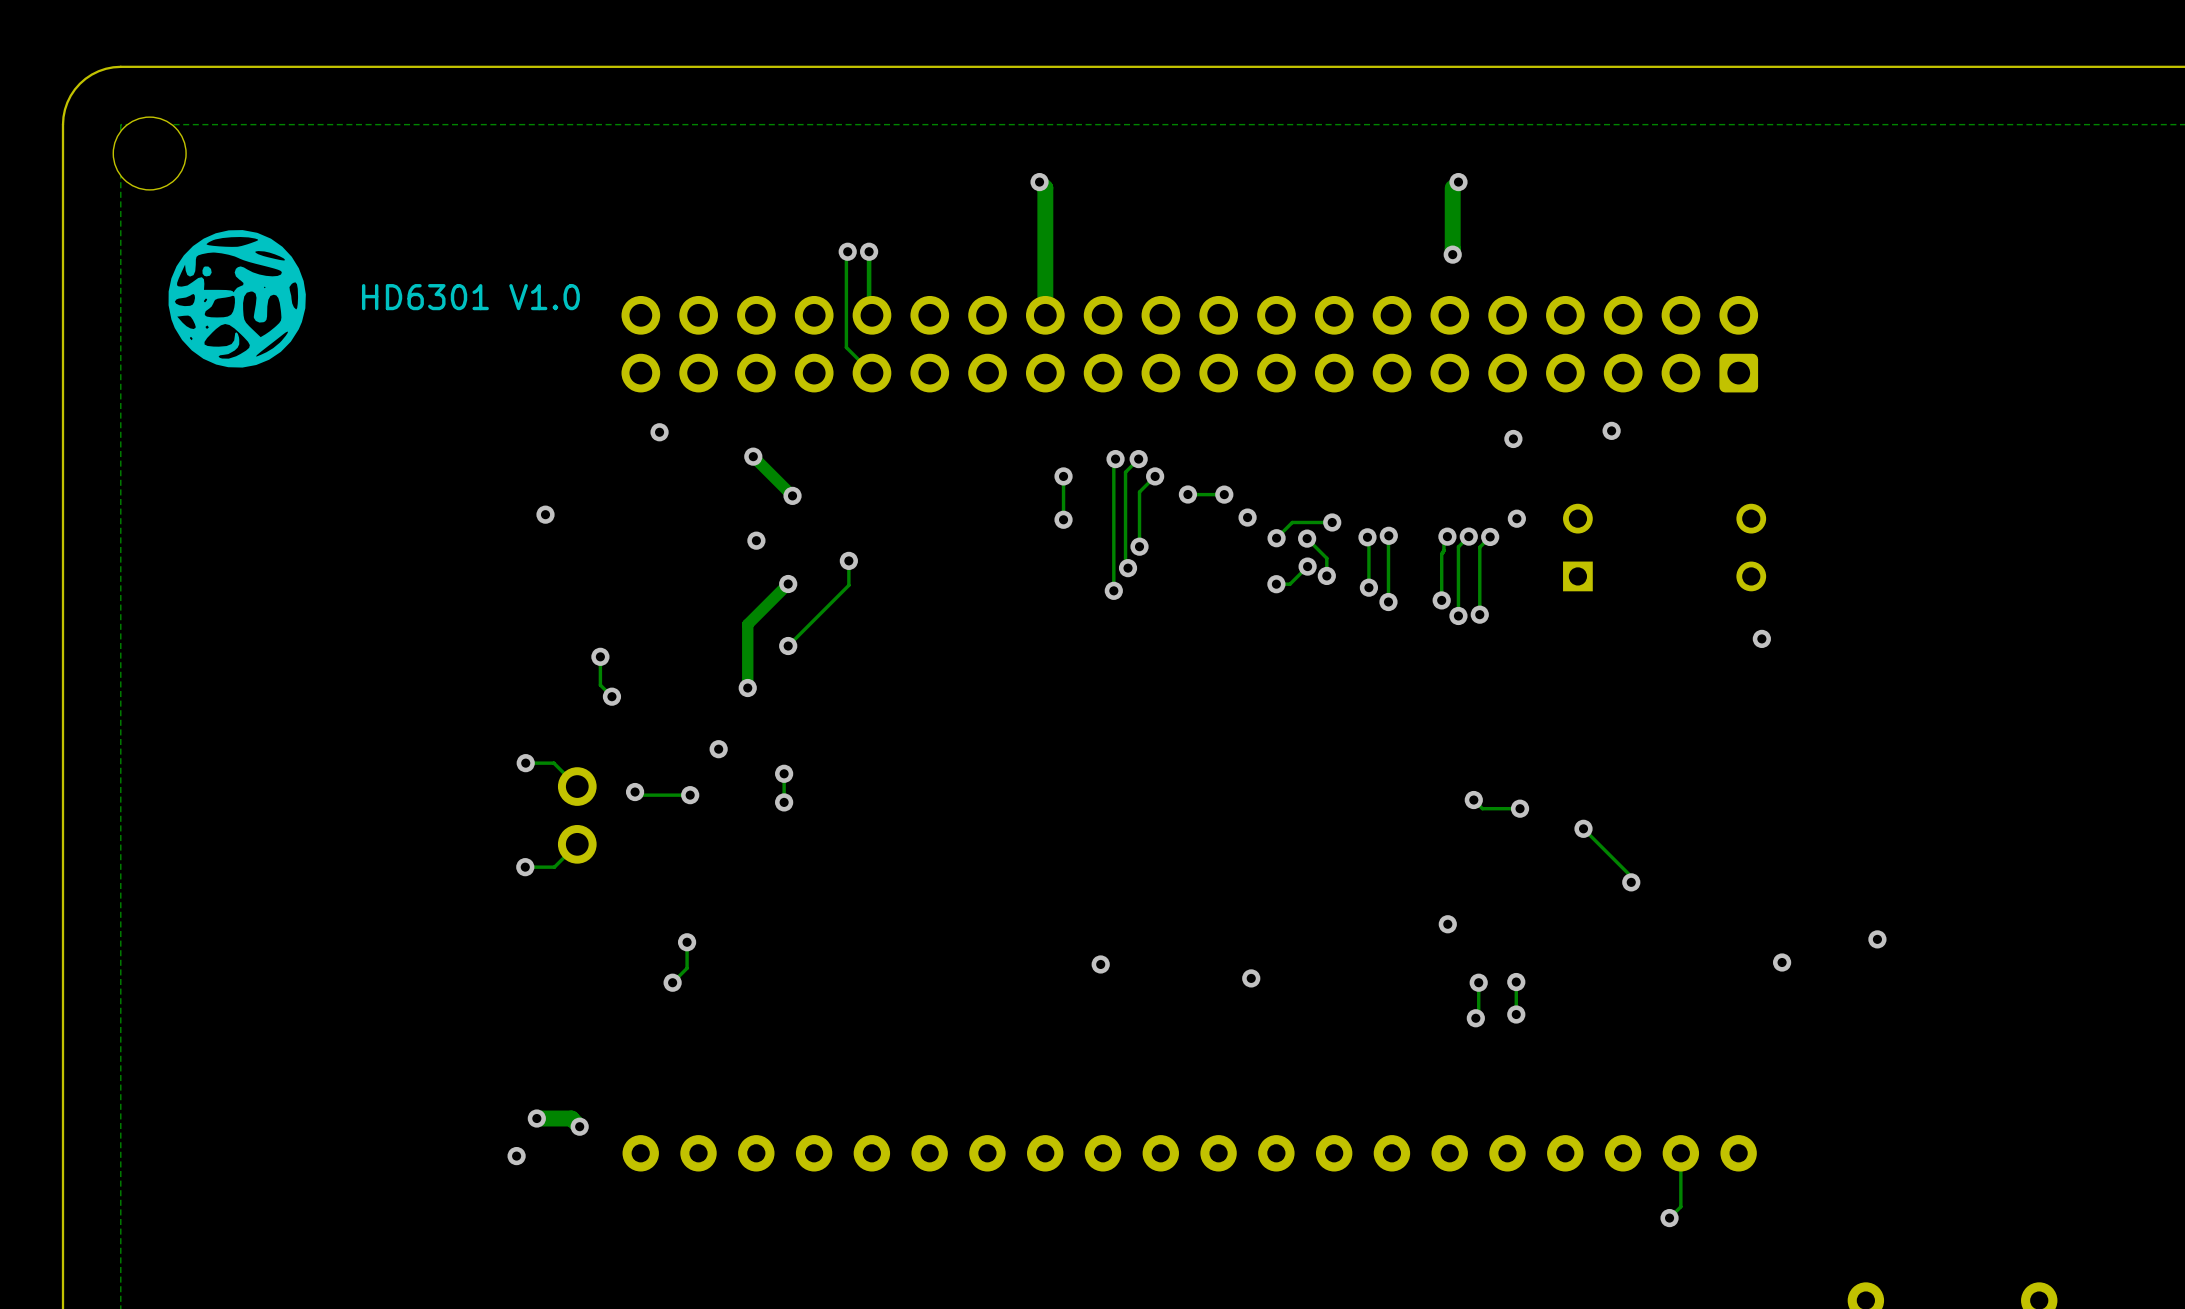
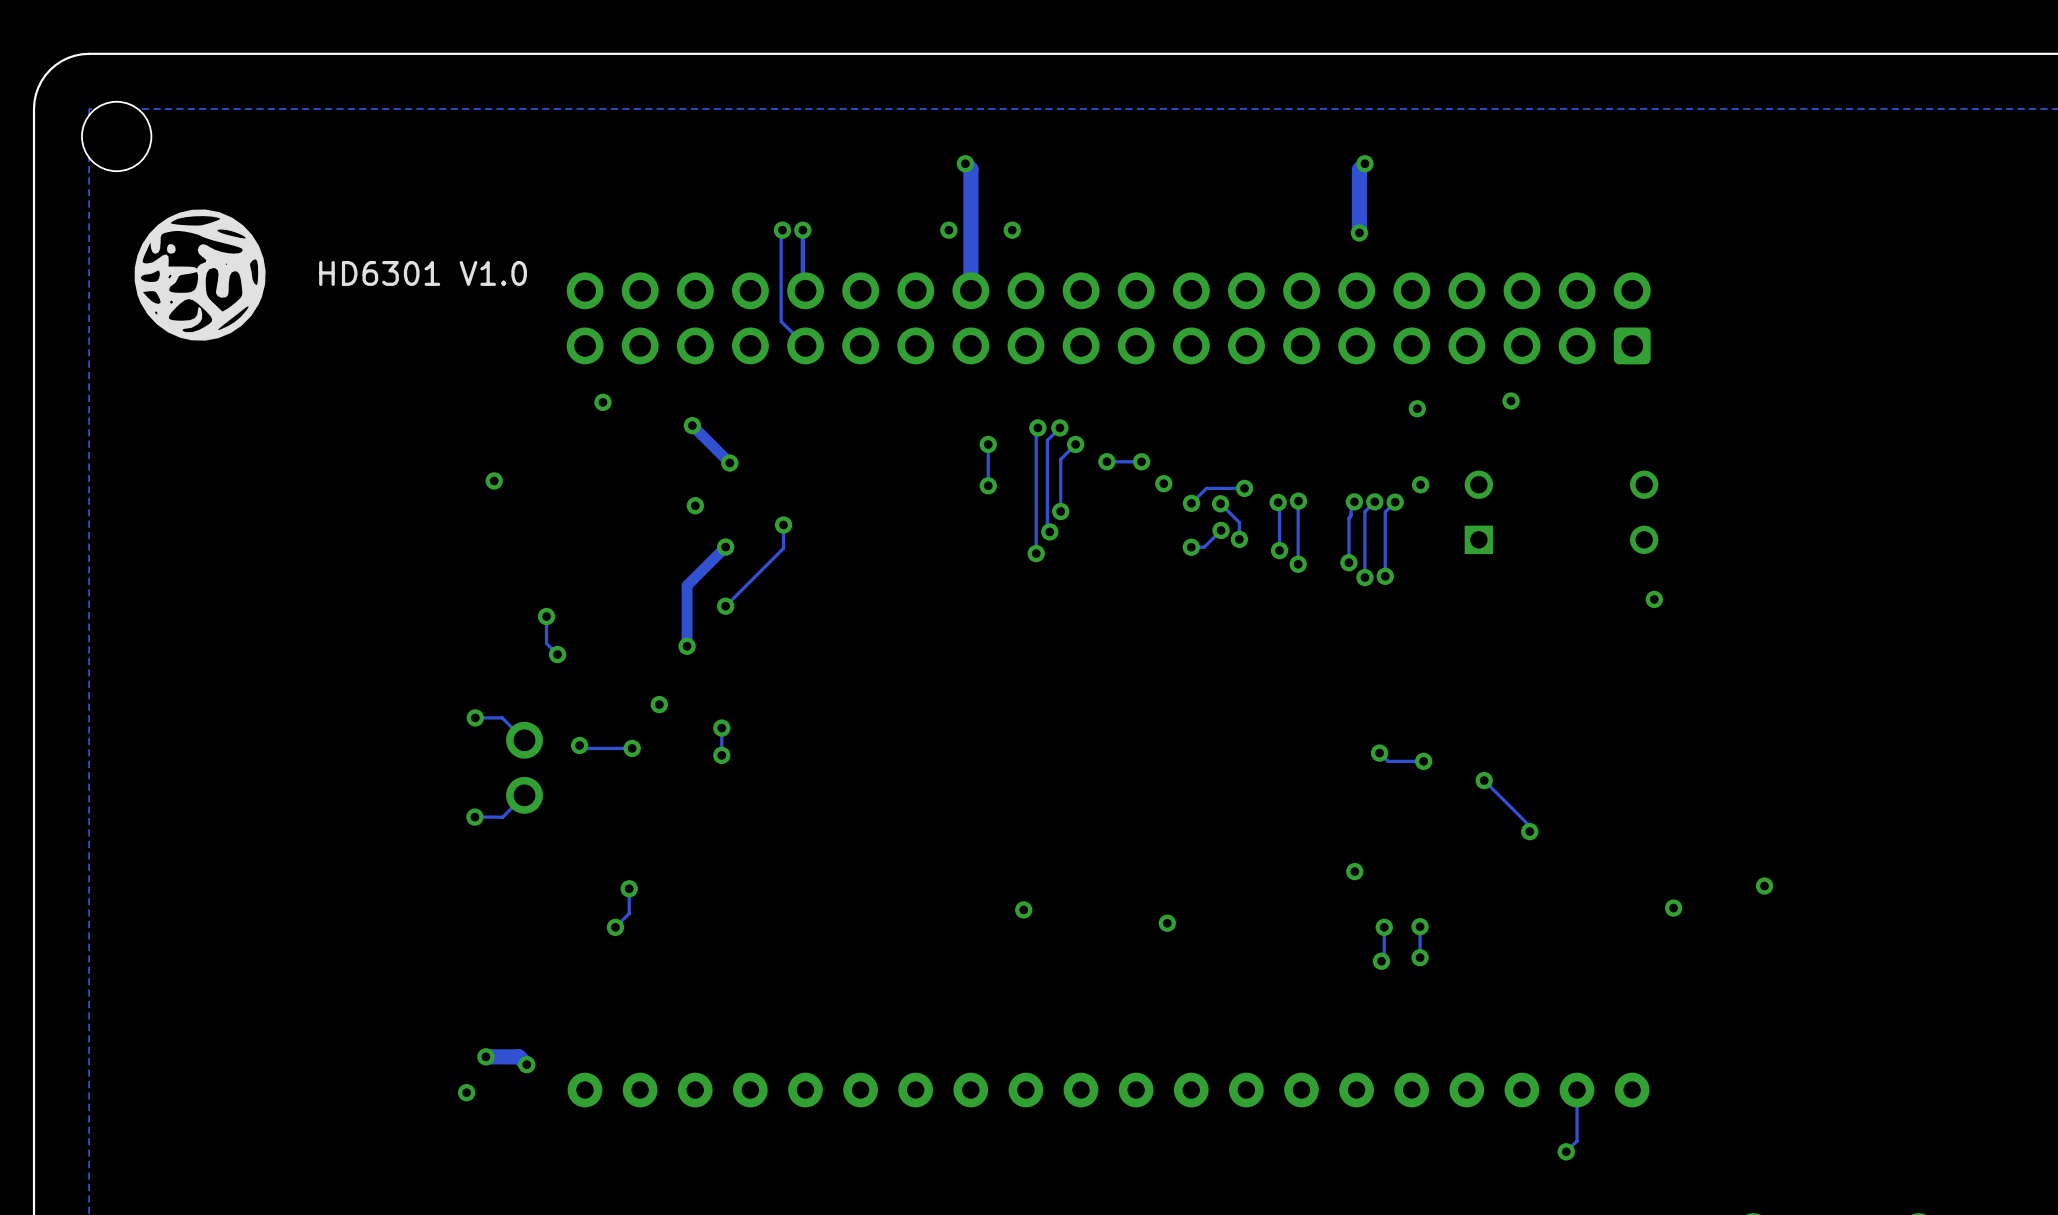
via: none -> (948, 230)
via: none -> (1012, 230)

